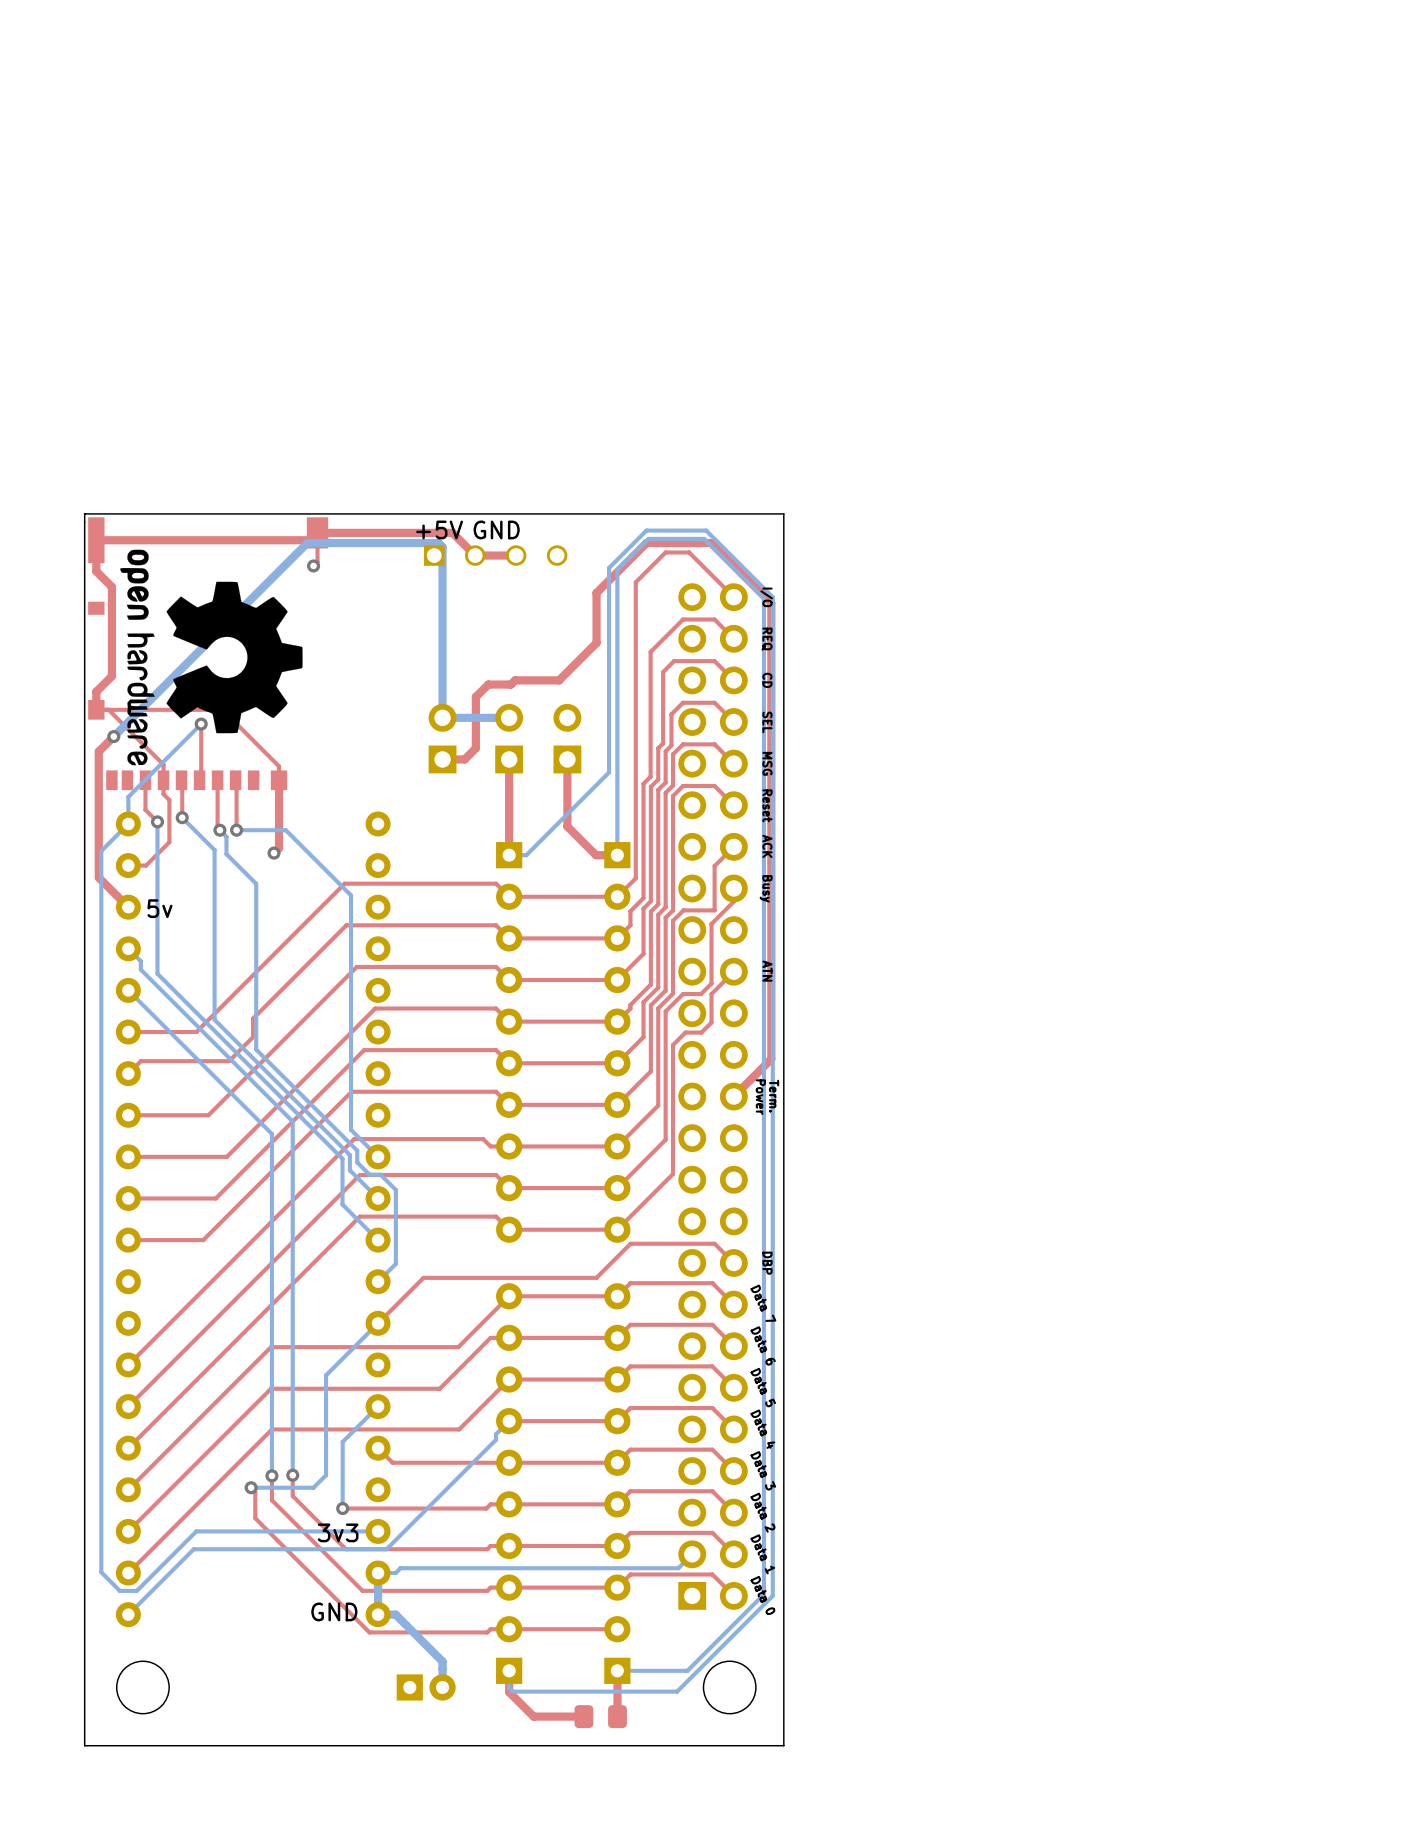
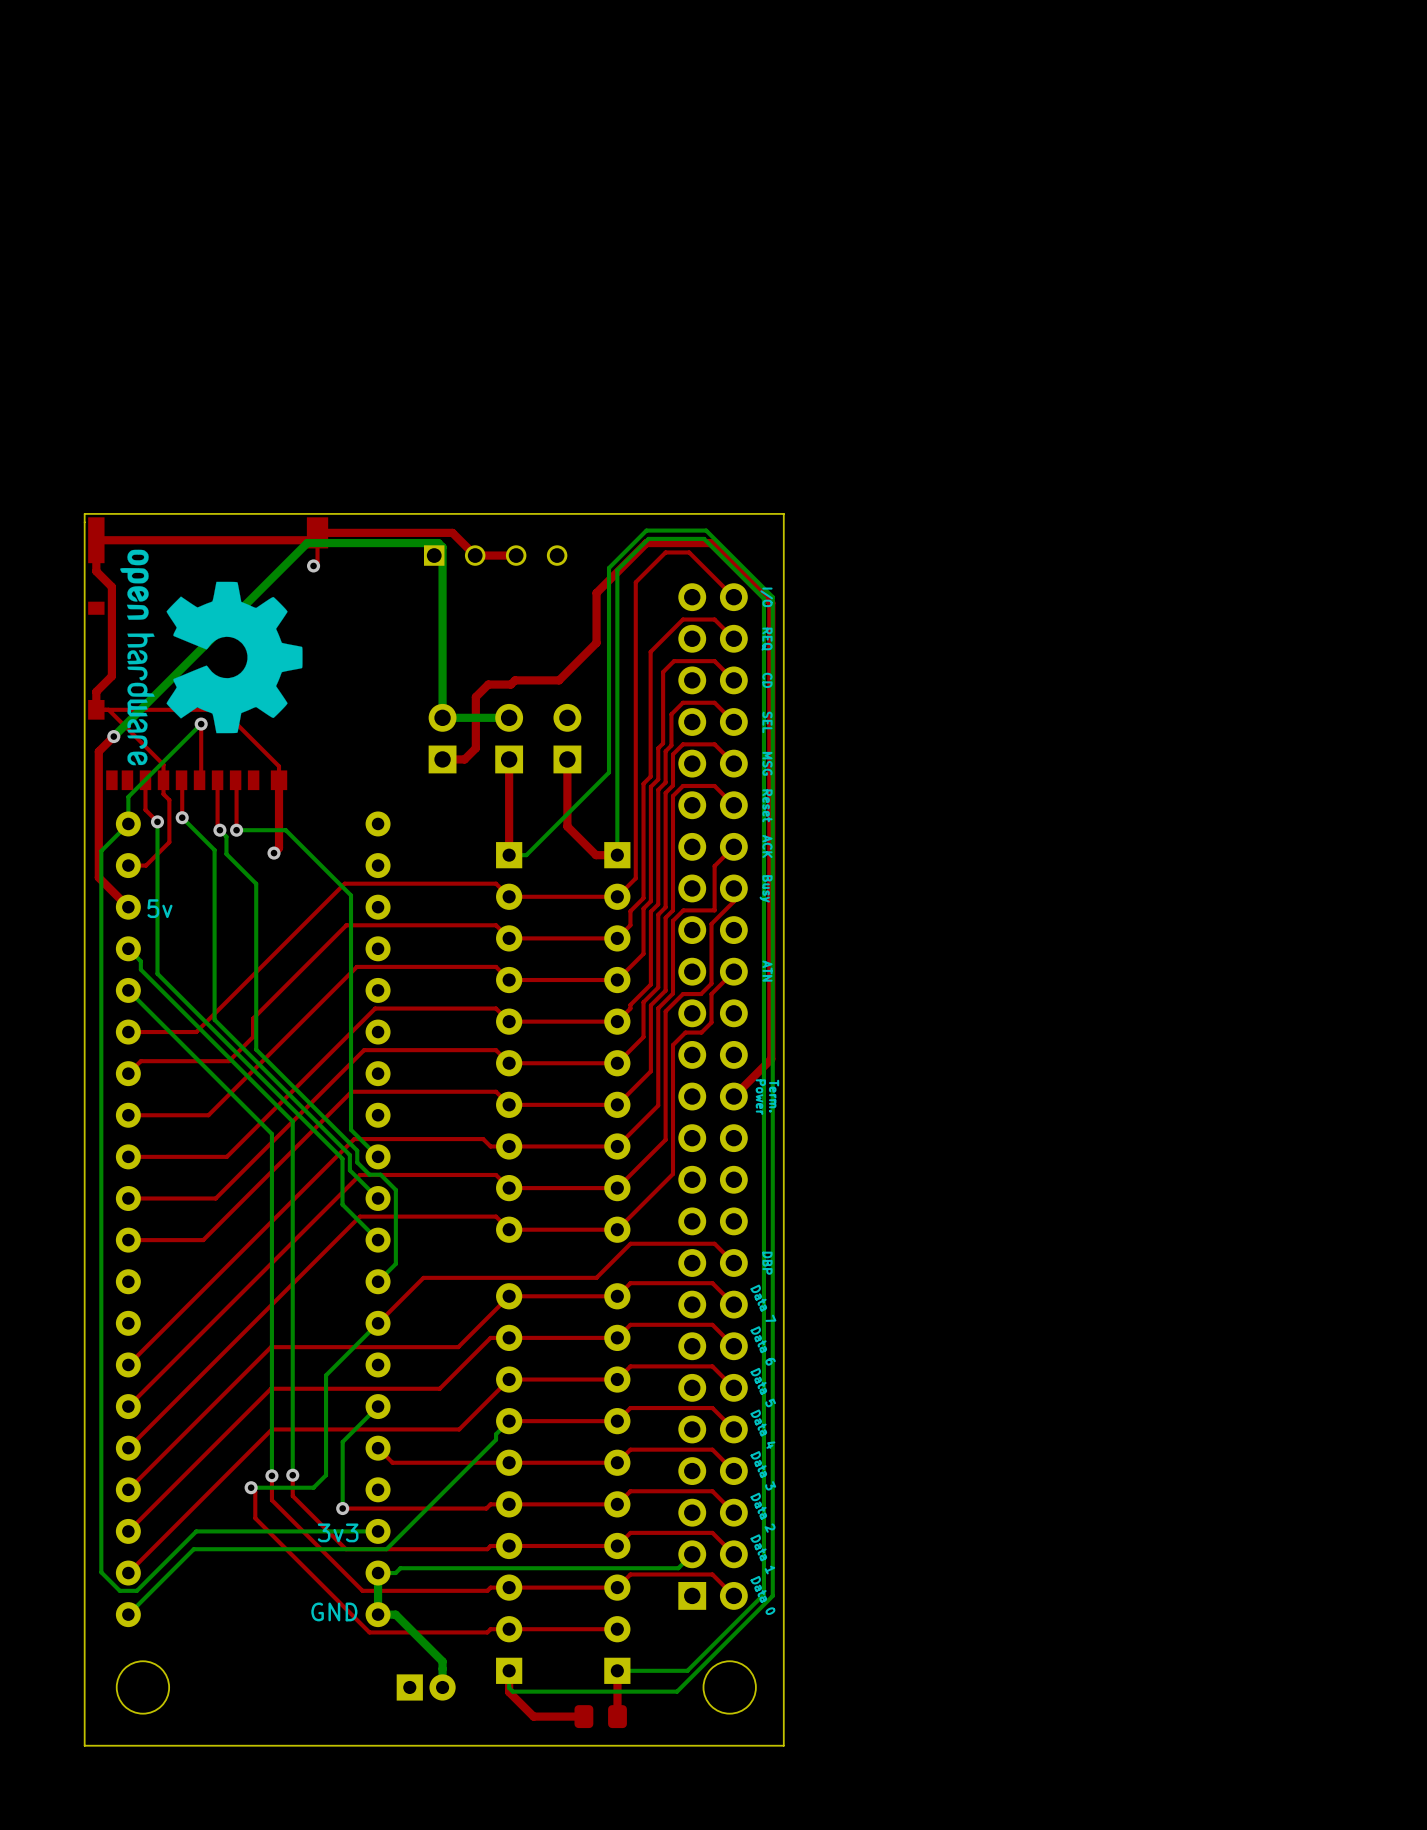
text: +5V (439, 529) -> none
text: GND (496, 529) -> none

